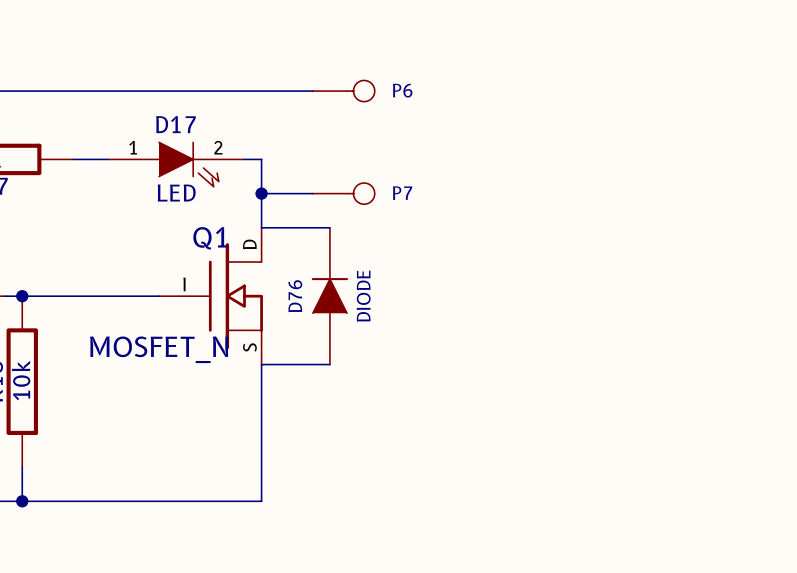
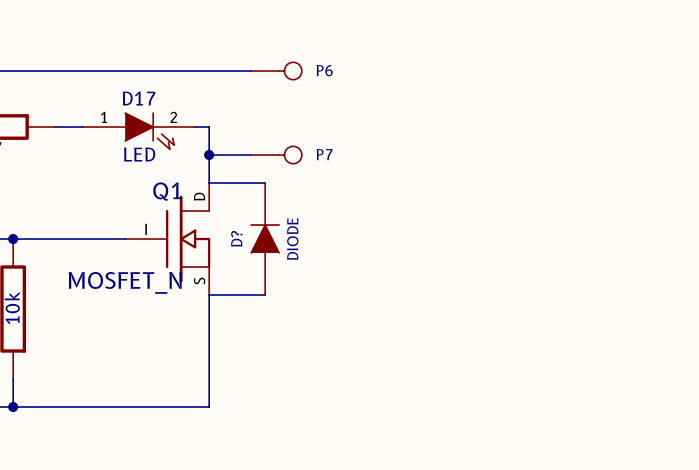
D76 name: D76 (295, 296) -> D? (236, 238)

